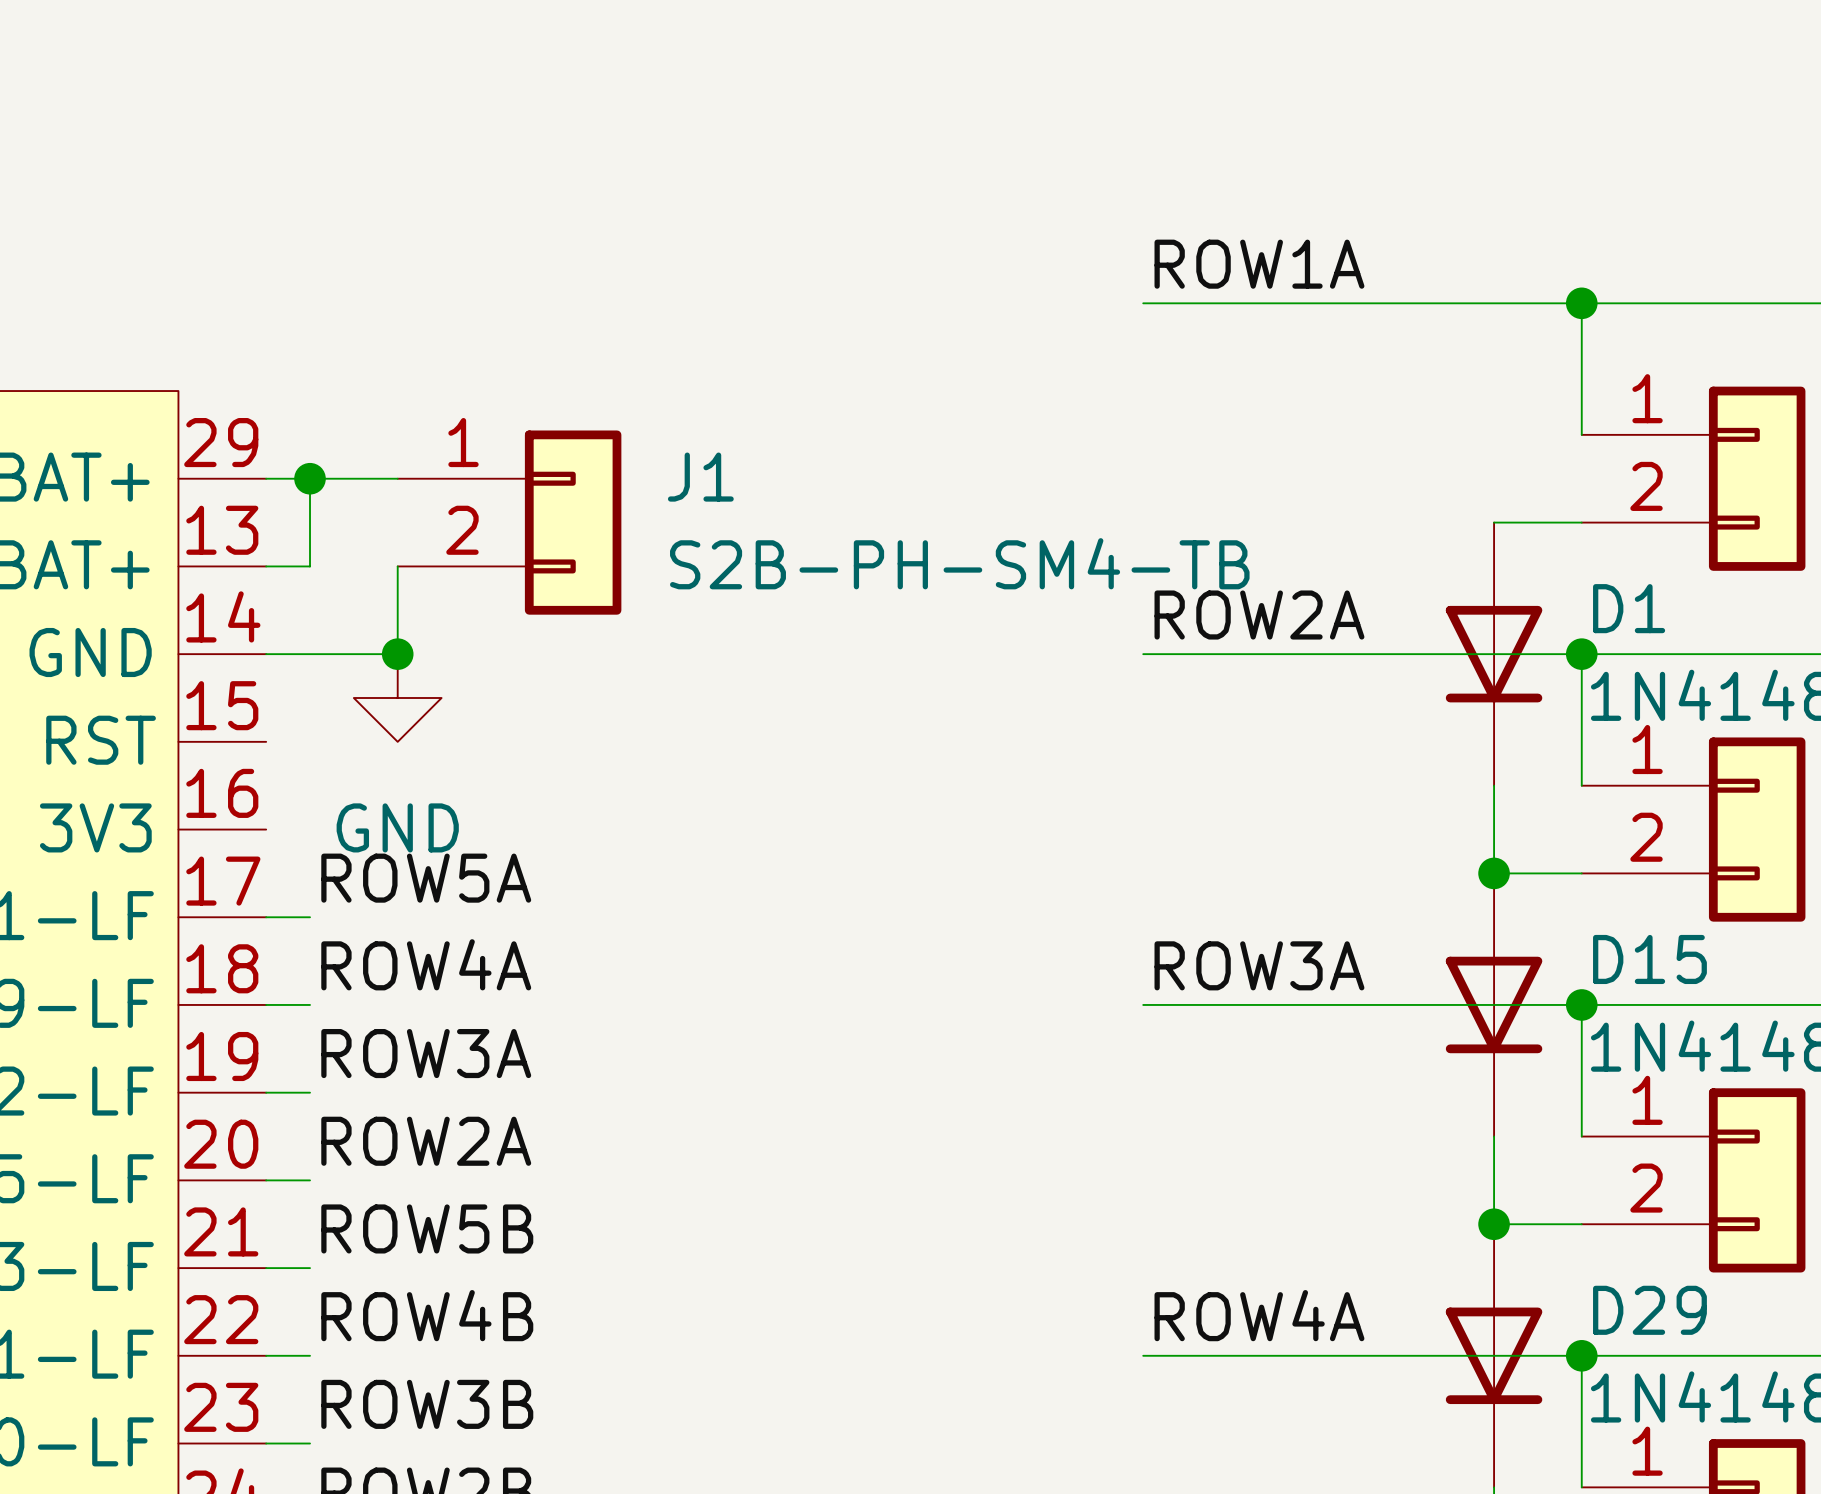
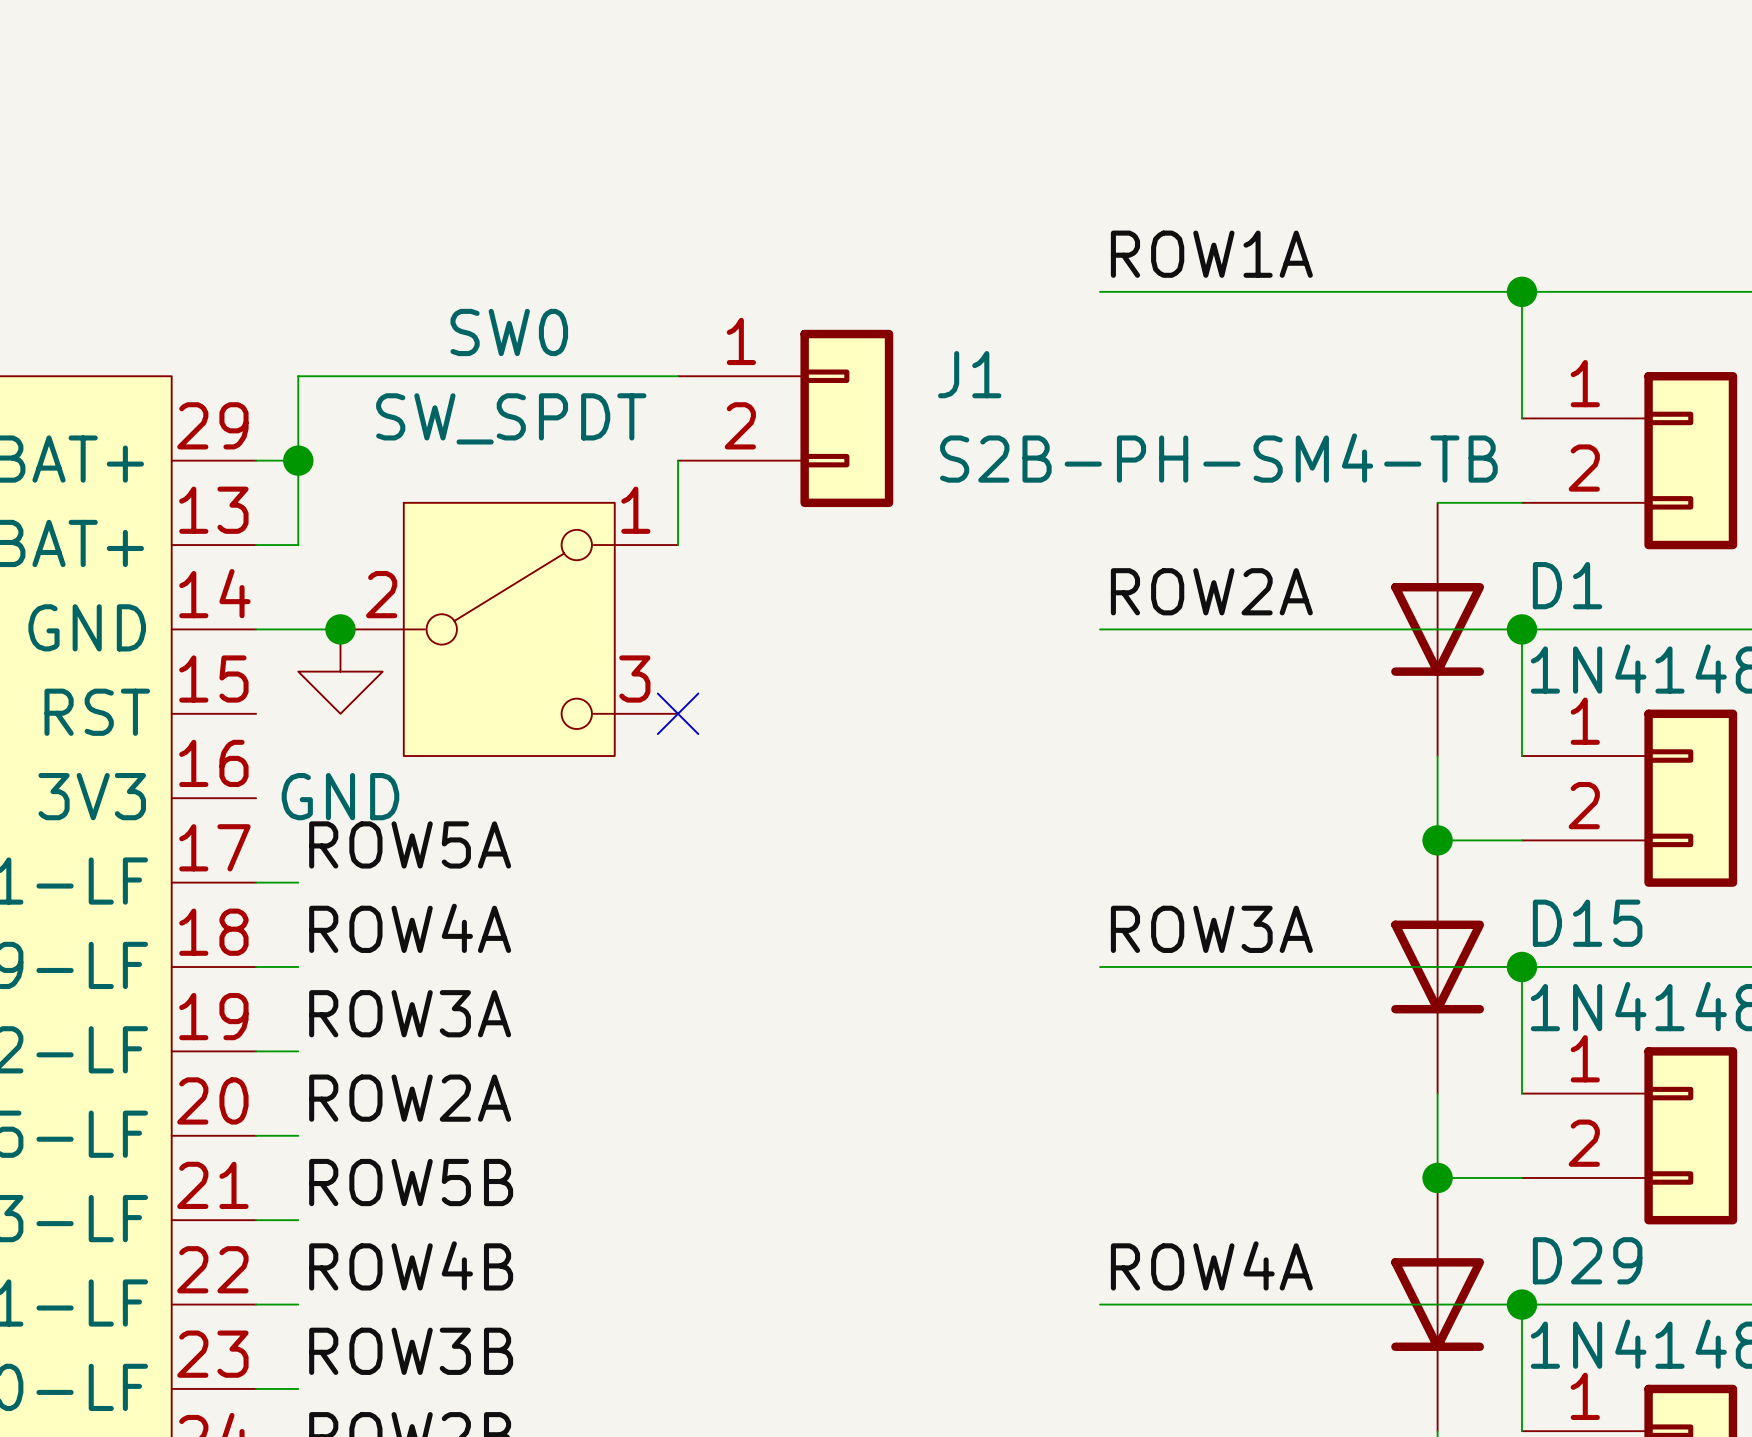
wire: (310, 478) (397, 478) -> (298, 460) (298, 376) (678, 376)
wire: none -> (678, 460) (678, 545)
J1 position: (509, 522) -> (785, 418)
wire: (397, 566) (397, 654) (353, 654) -> none
junction position: (397, 654) -> (340, 629)
SW0: none -> SW_SPDT (509, 629)
power symbol position: GND (397, 698) -> GND (340, 671)
no-connect mark: none -> (678, 713)

